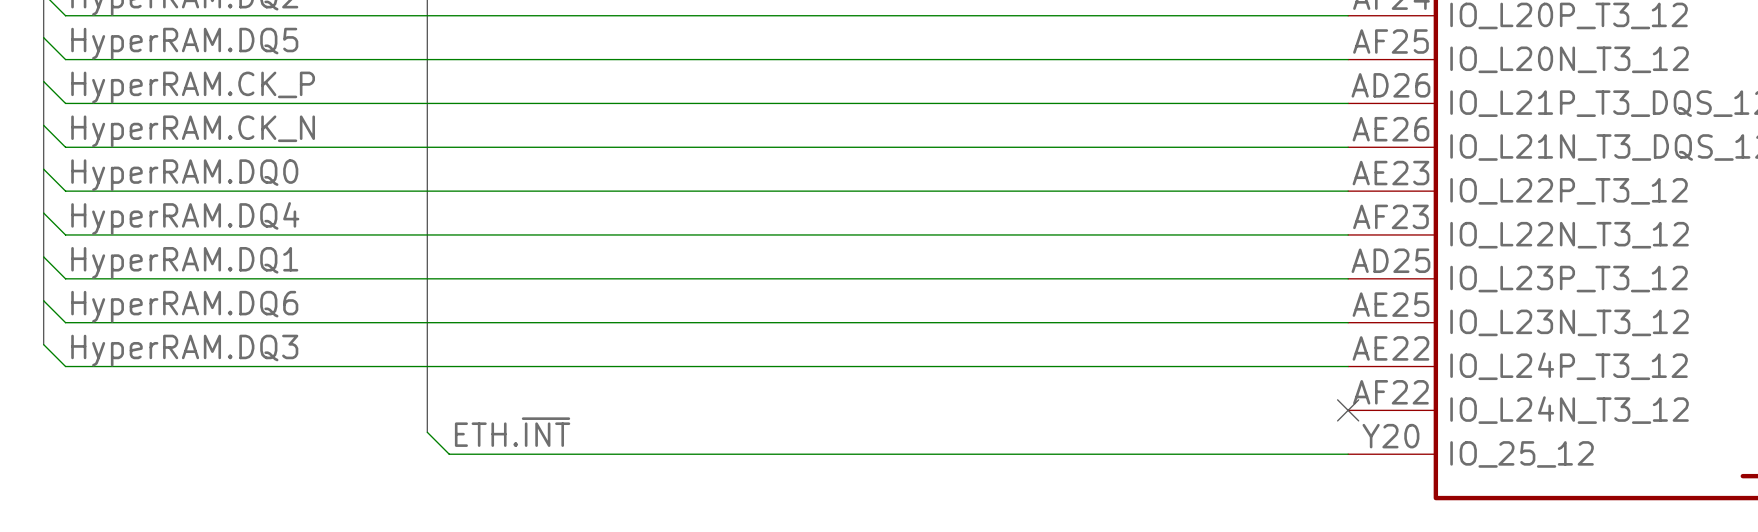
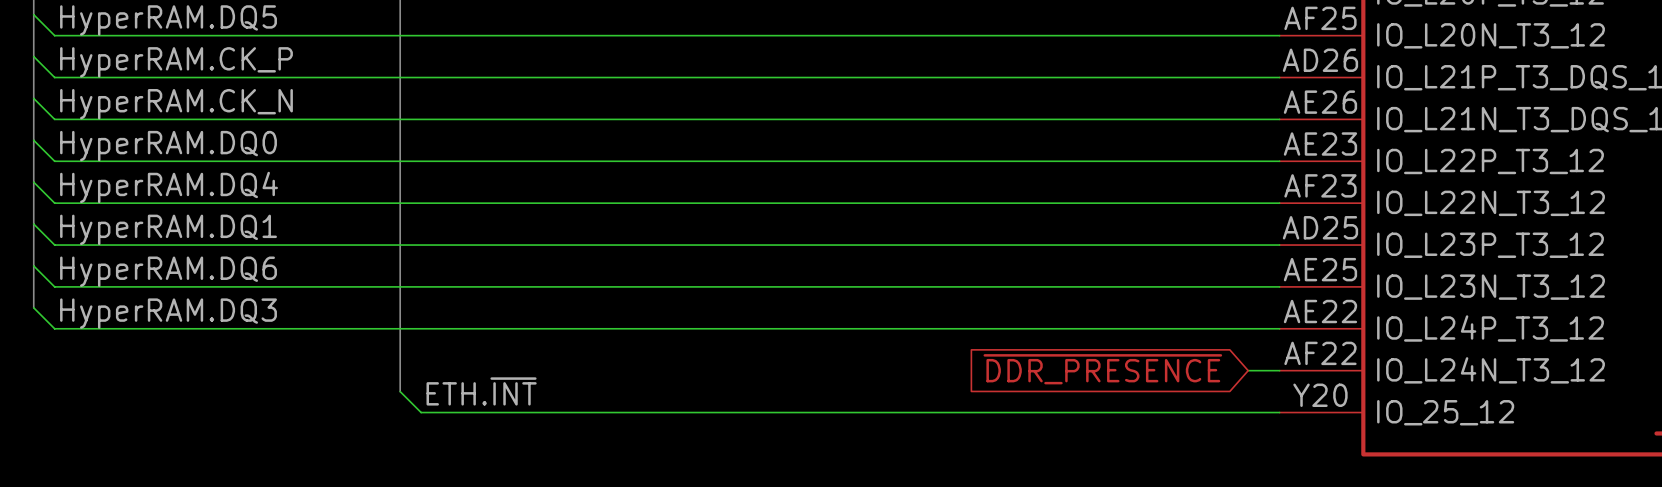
global label: none -> ~{DDR_PRESENCE} (1102, 369)
wire: none -> (1248, 370) (1279, 370)
no-connect mark: (1348, 410) -> none

